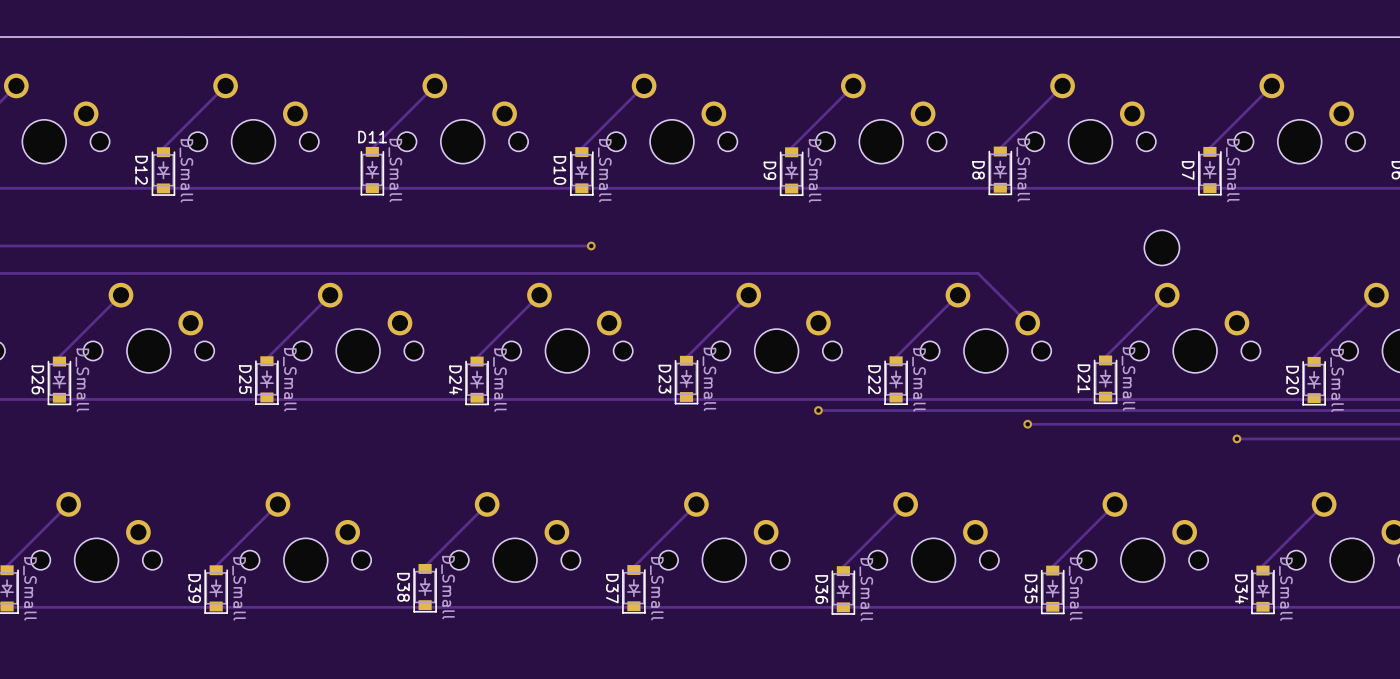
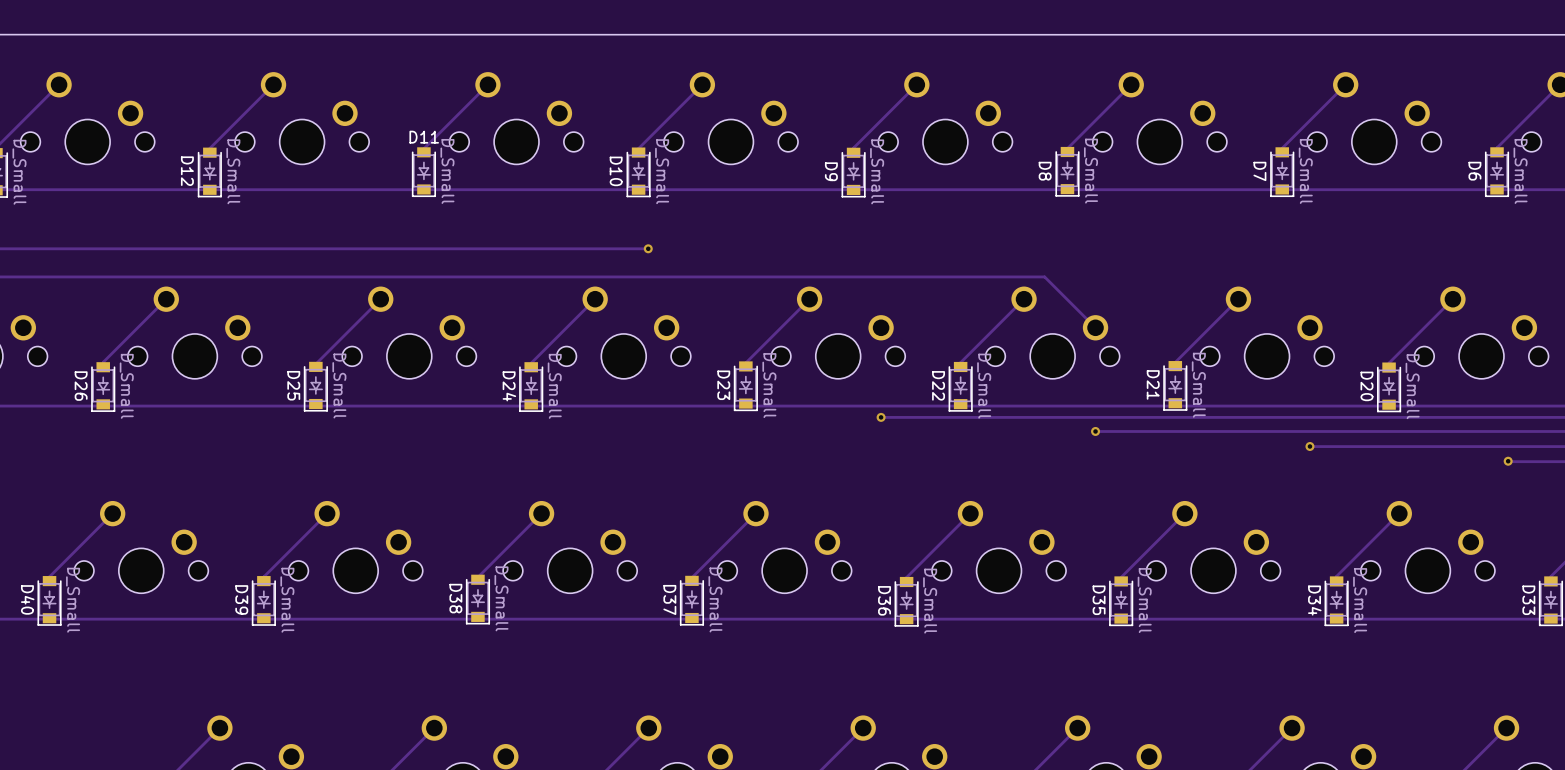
part: (1161, 247) -> none

